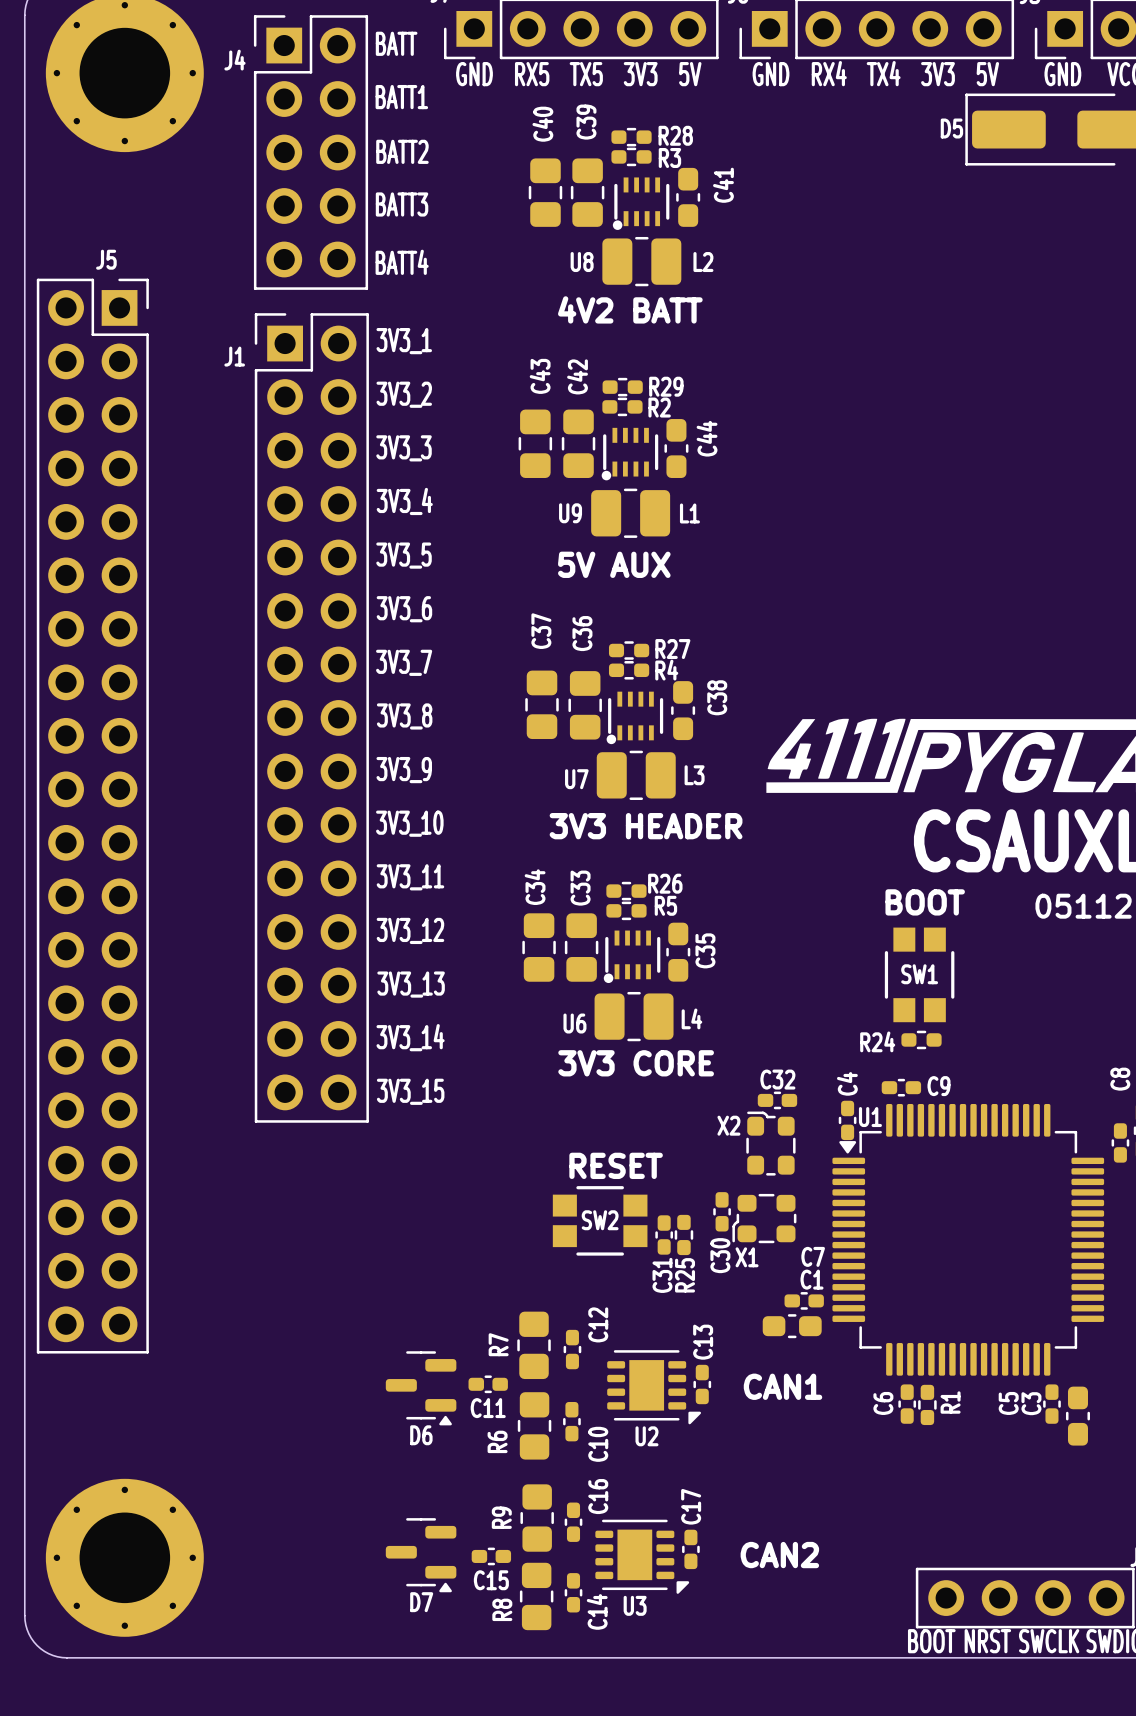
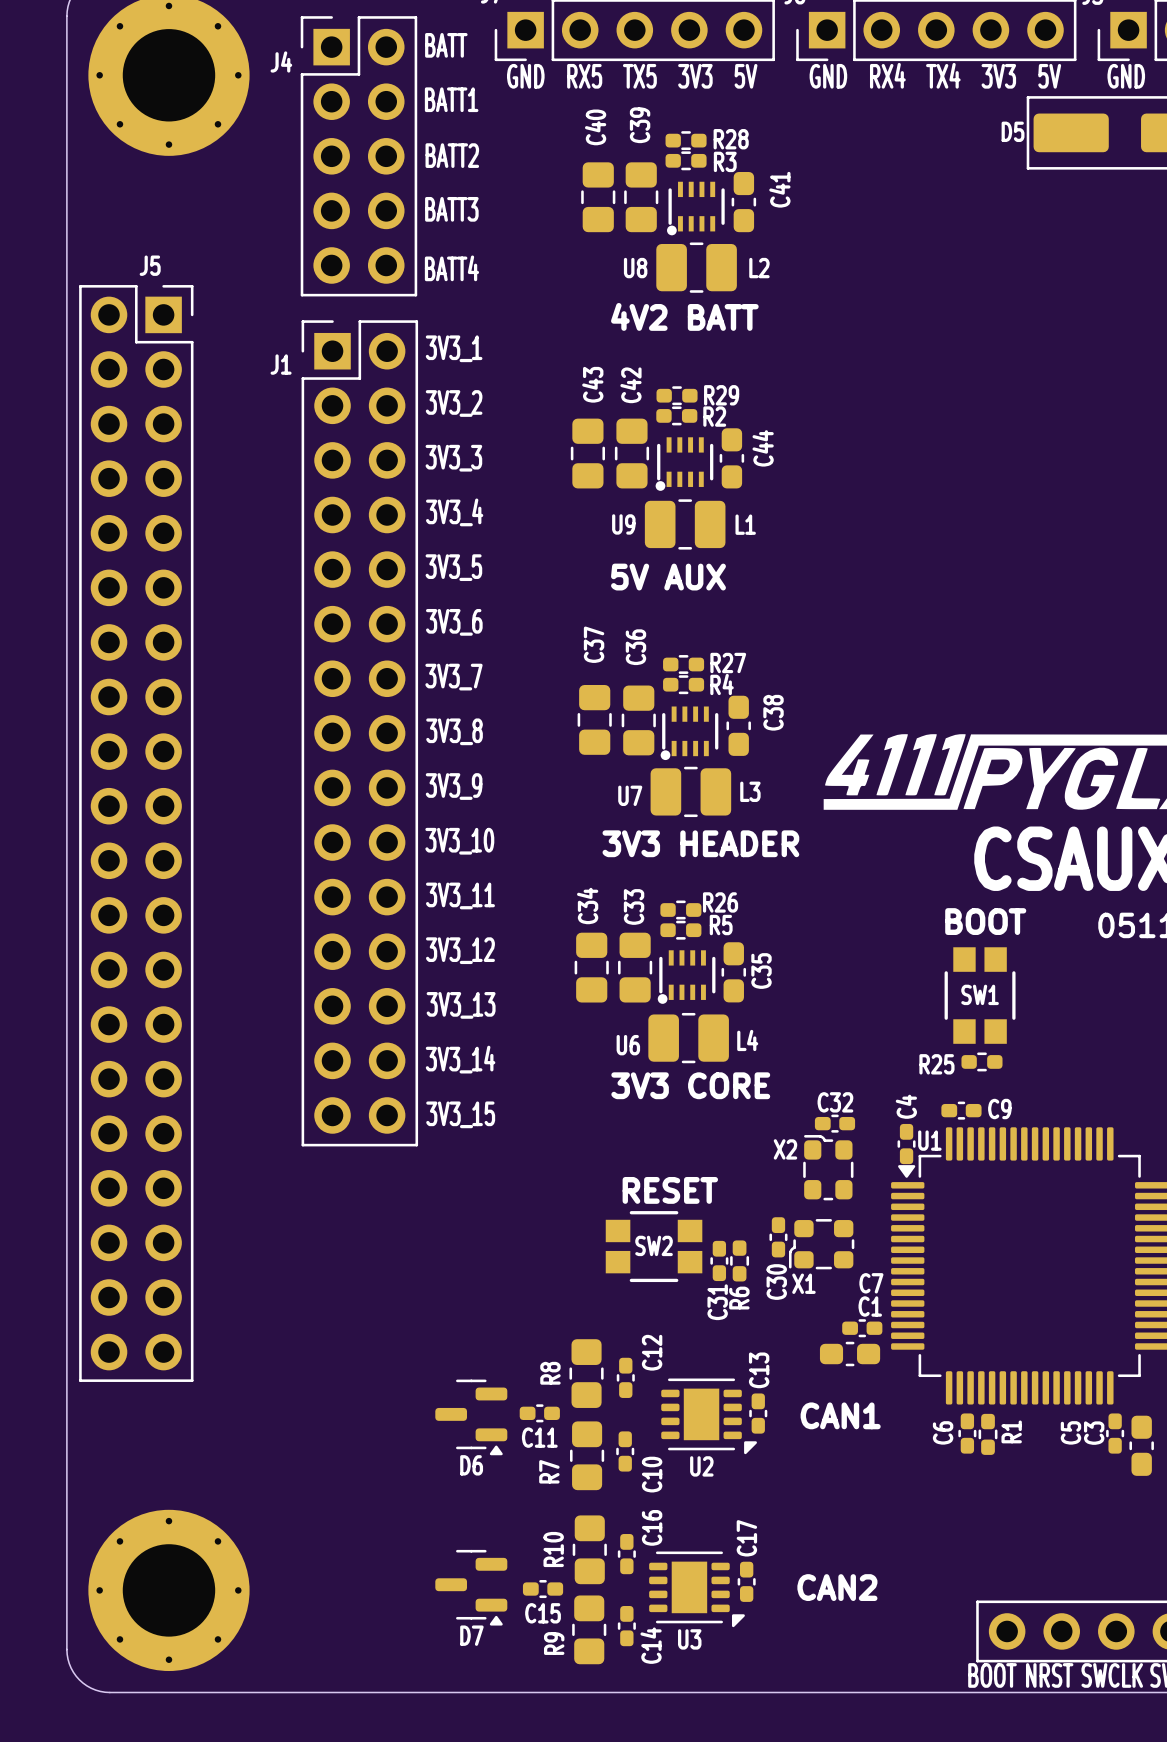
R24 name: R24 (877, 1041) -> R25 (936, 1064)
R25 name: R25 (685, 1275) -> R6 (739, 1298)
R7 name: R7 (498, 1344) -> R8 (550, 1373)
R6 name: R6 (497, 1441) -> R7 (549, 1471)
R9 name: R9 (501, 1517) -> R10 (553, 1549)
R8 name: R8 (502, 1609) -> R9 (554, 1643)

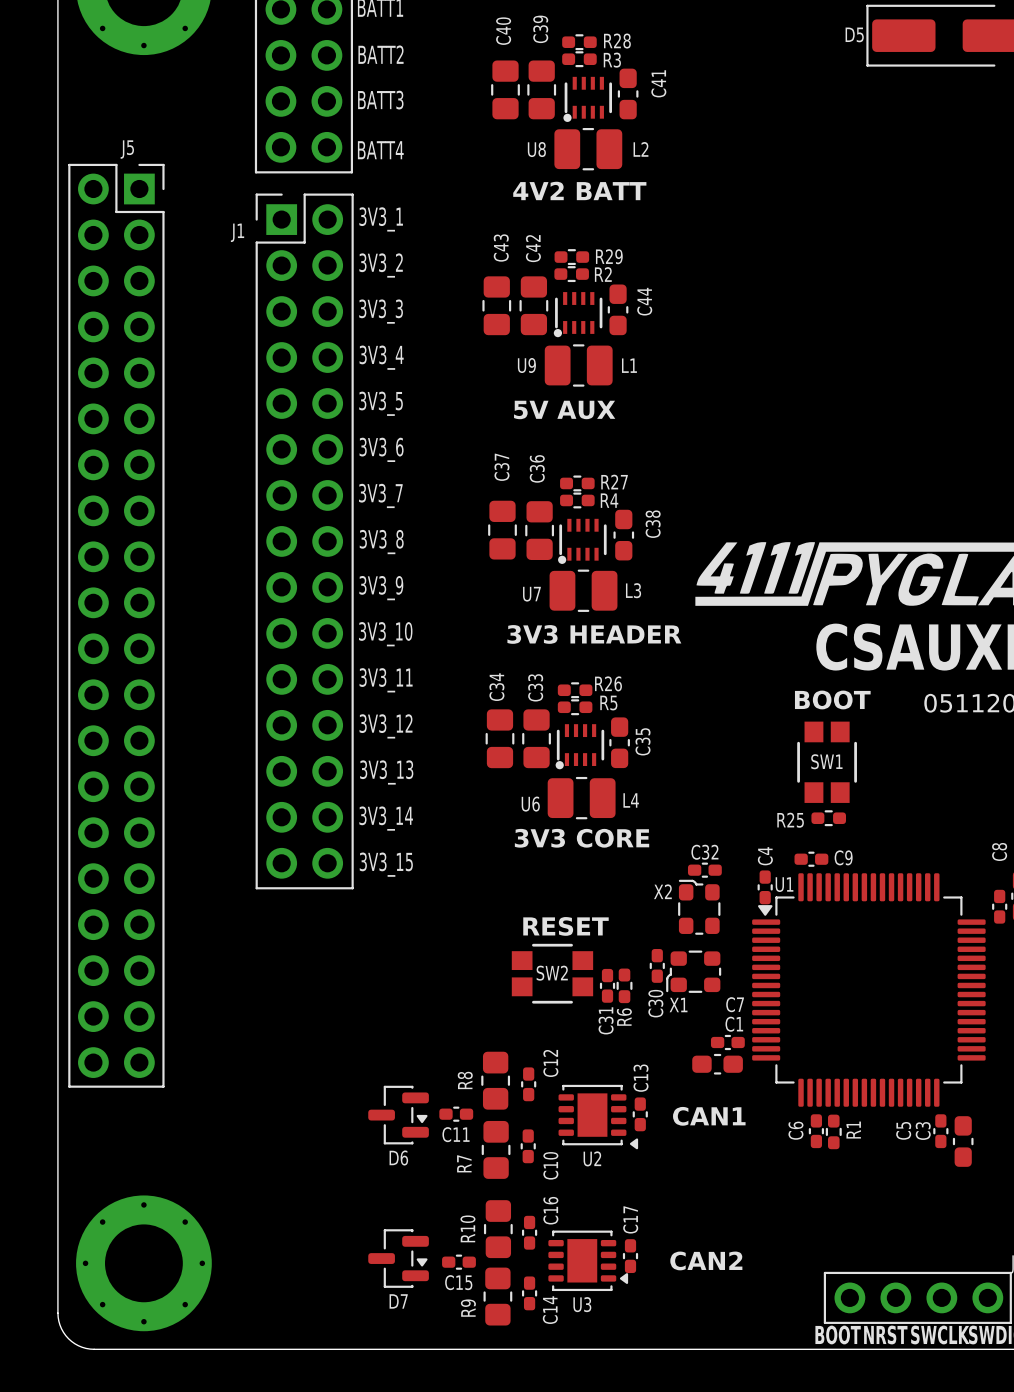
U2 footprint: [661, 1378, 757, 1455] -> [558, 1084, 639, 1150]
D6 footprint: [435, 1379, 508, 1456] -> [368, 1085, 429, 1145]
D7 footprint: [435, 1549, 508, 1626] -> [368, 1229, 429, 1288]
U3 footprint: [649, 1551, 745, 1628] -> [548, 1230, 629, 1292]

